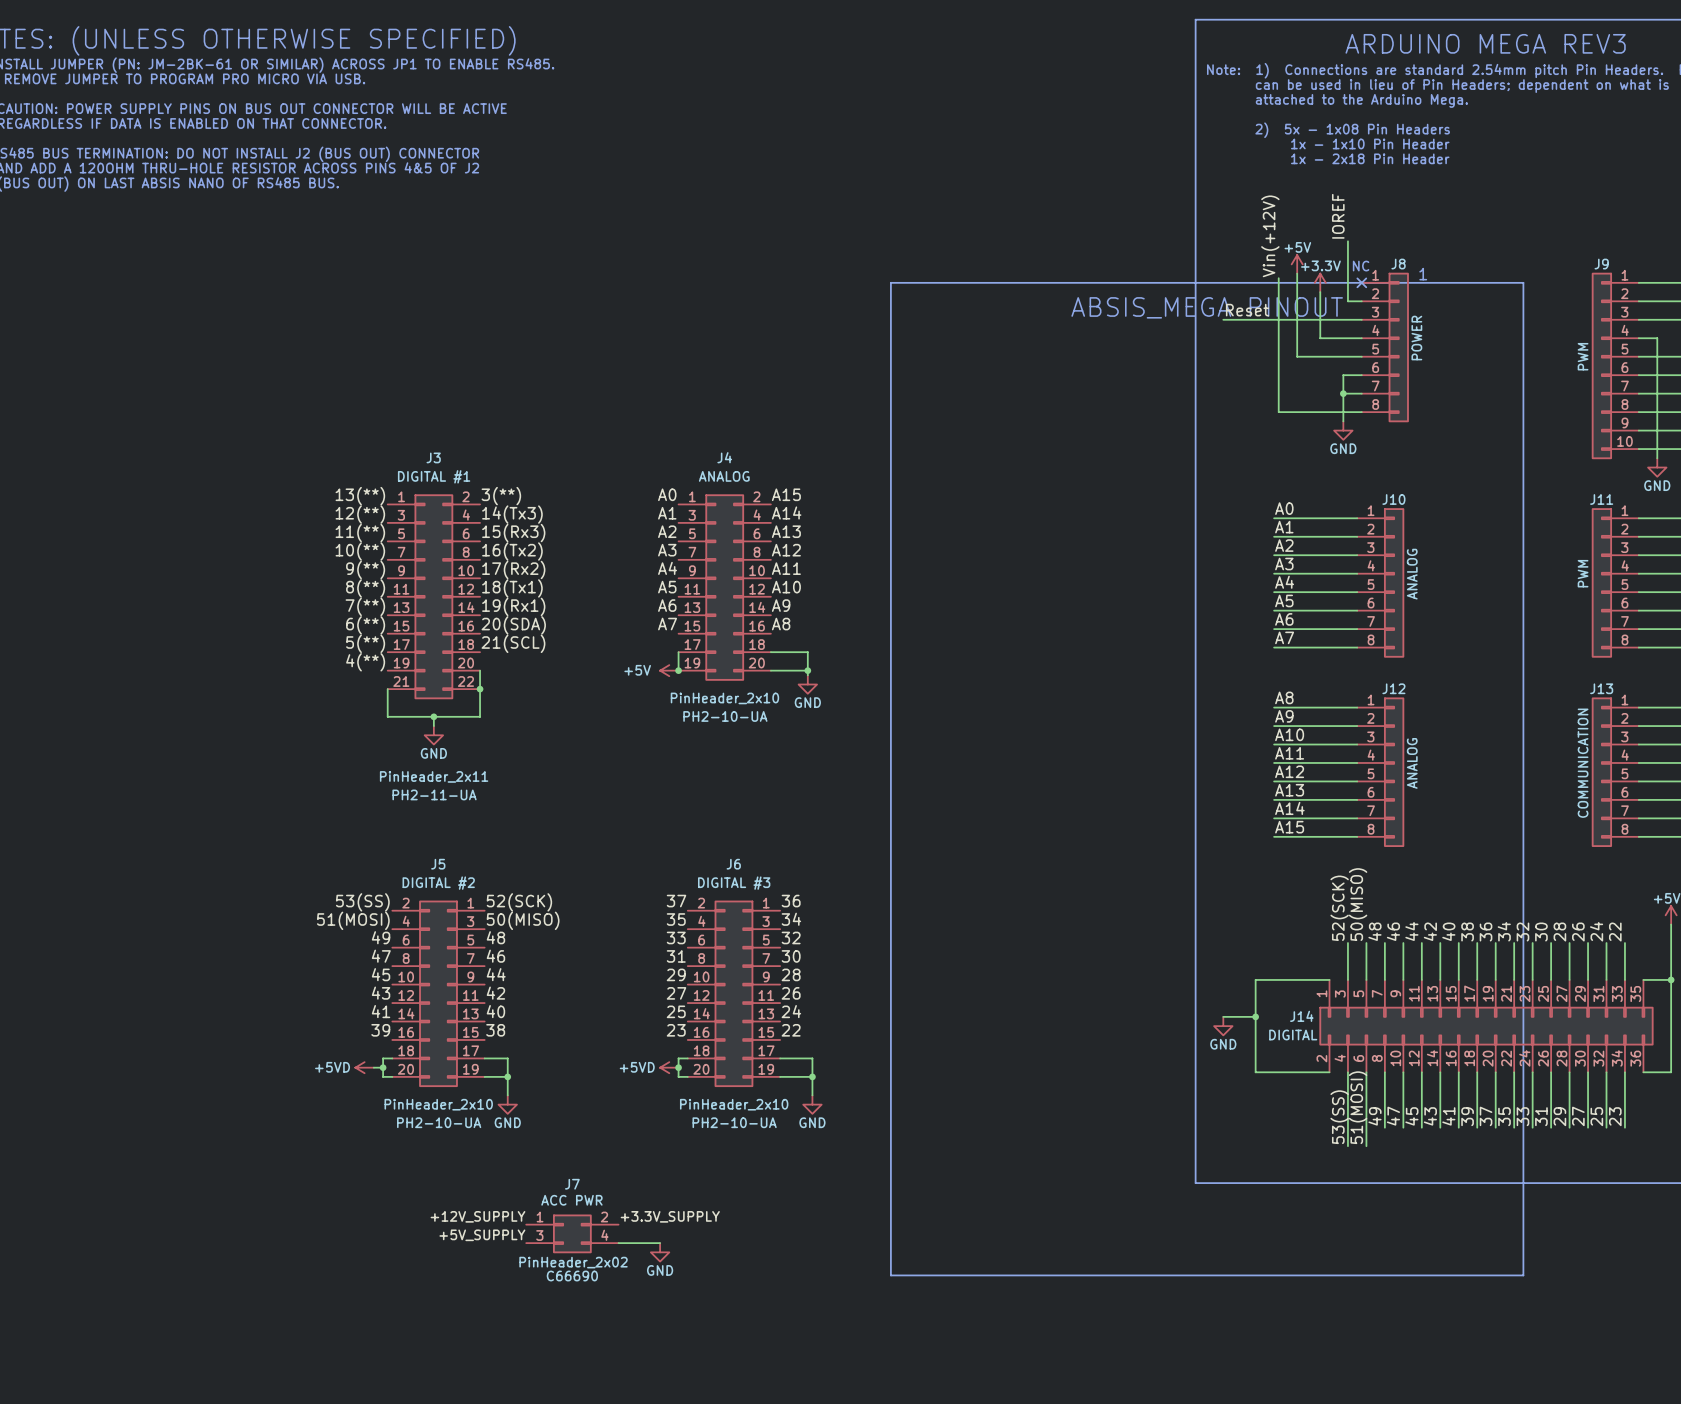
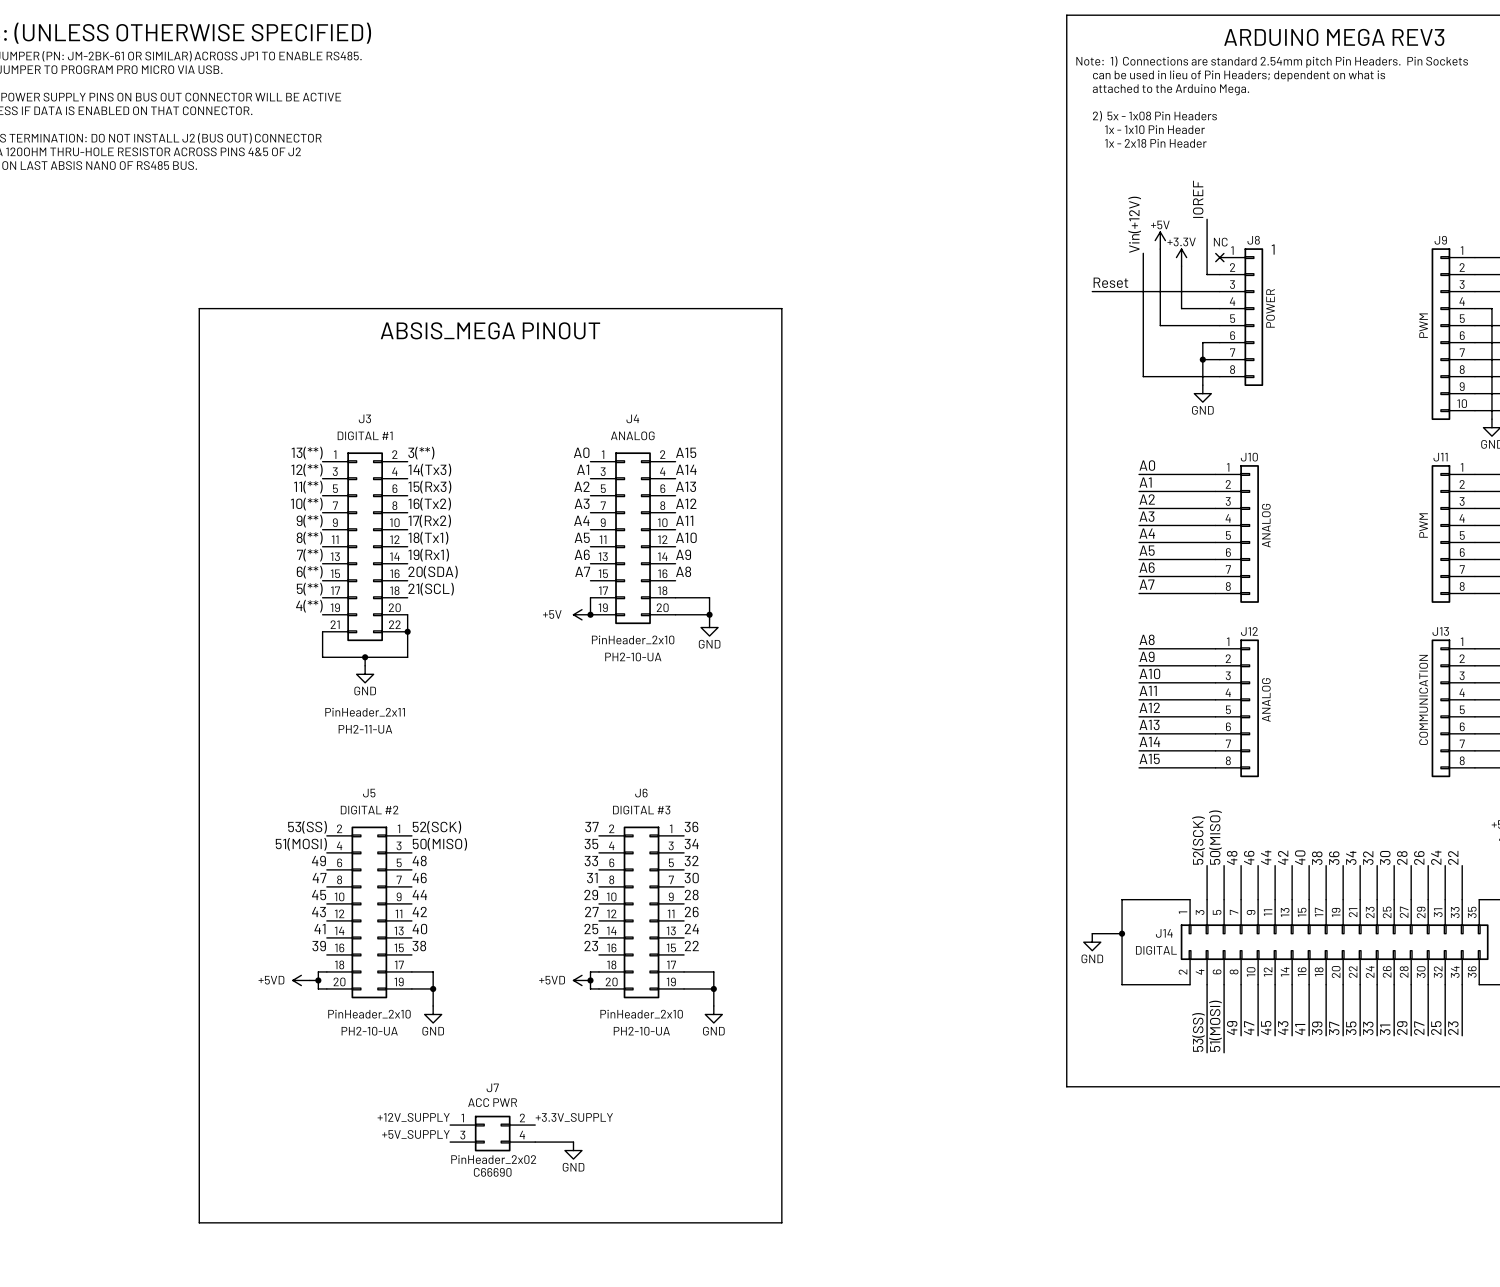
line: (890, 282) (1523, 282) (1523, 1275) (890, 1275) (890, 282) -> none
text: ABSIS_MEGA PINOUT (1207, 307) -> none
line: none -> (199, 308) (781, 308) (781, 1222) (199, 1222) (199, 308)
text: none -> ABSIS_MEGA PINOUT (490, 330)

